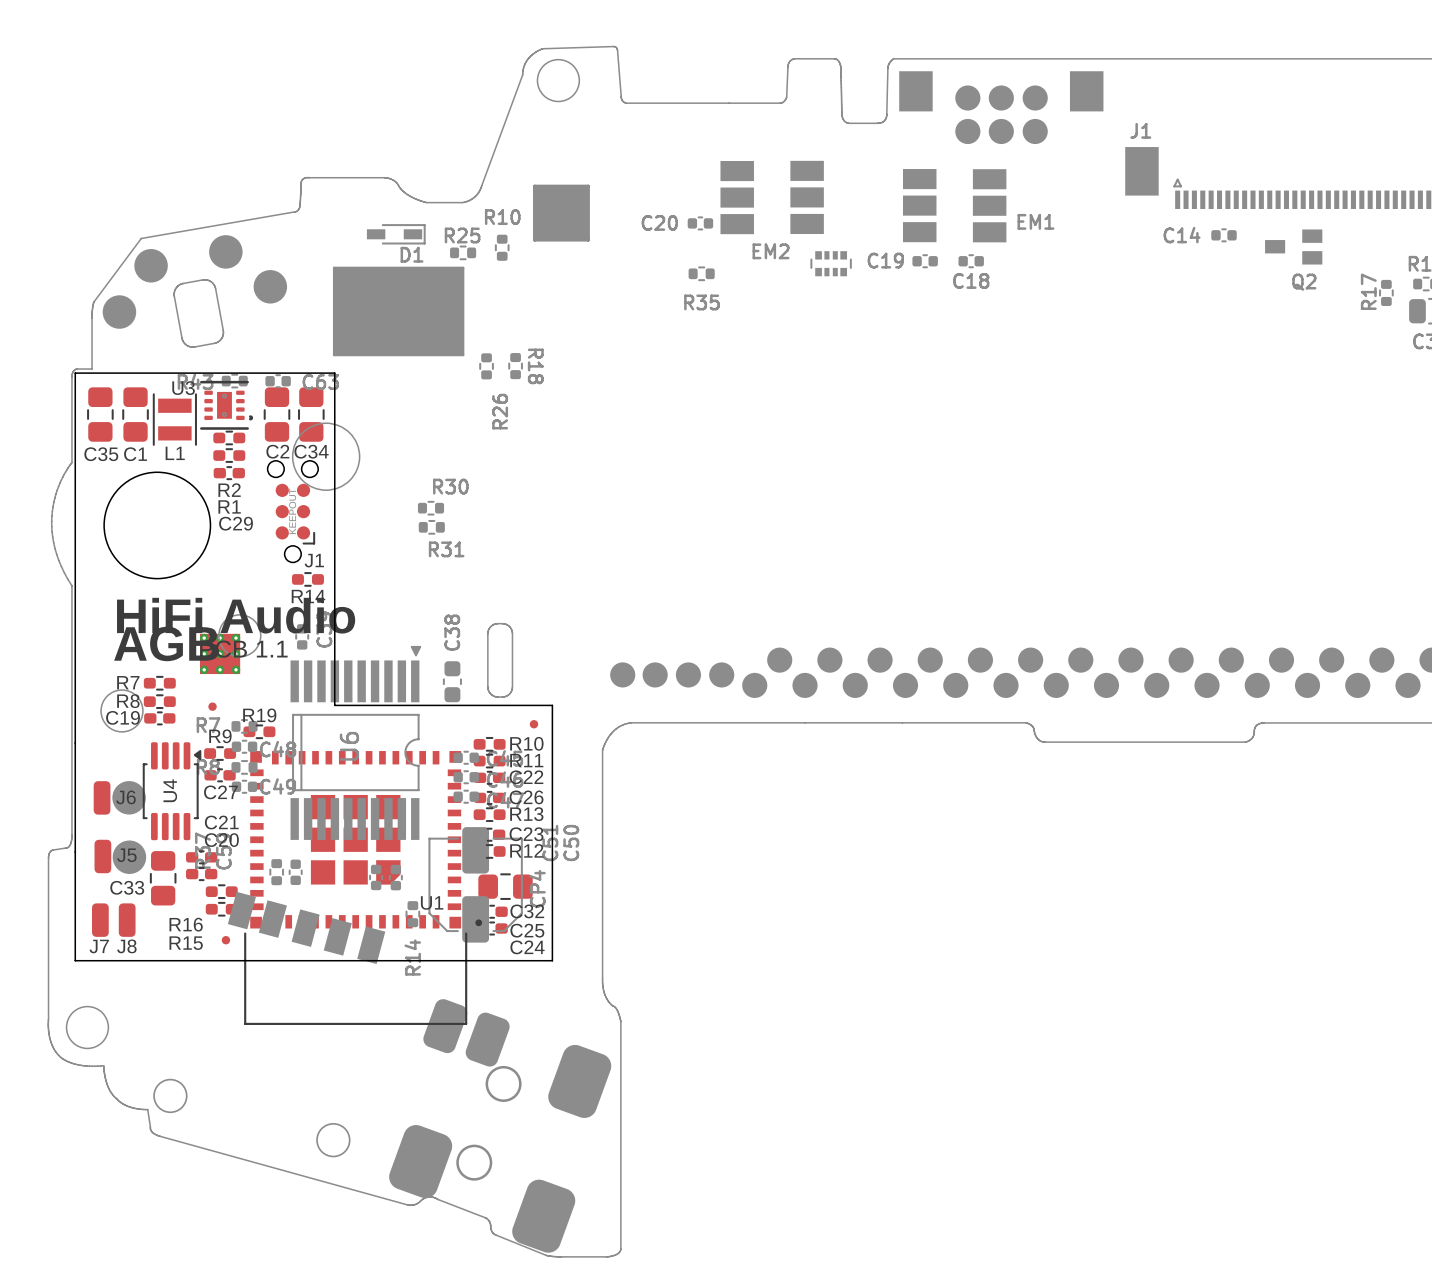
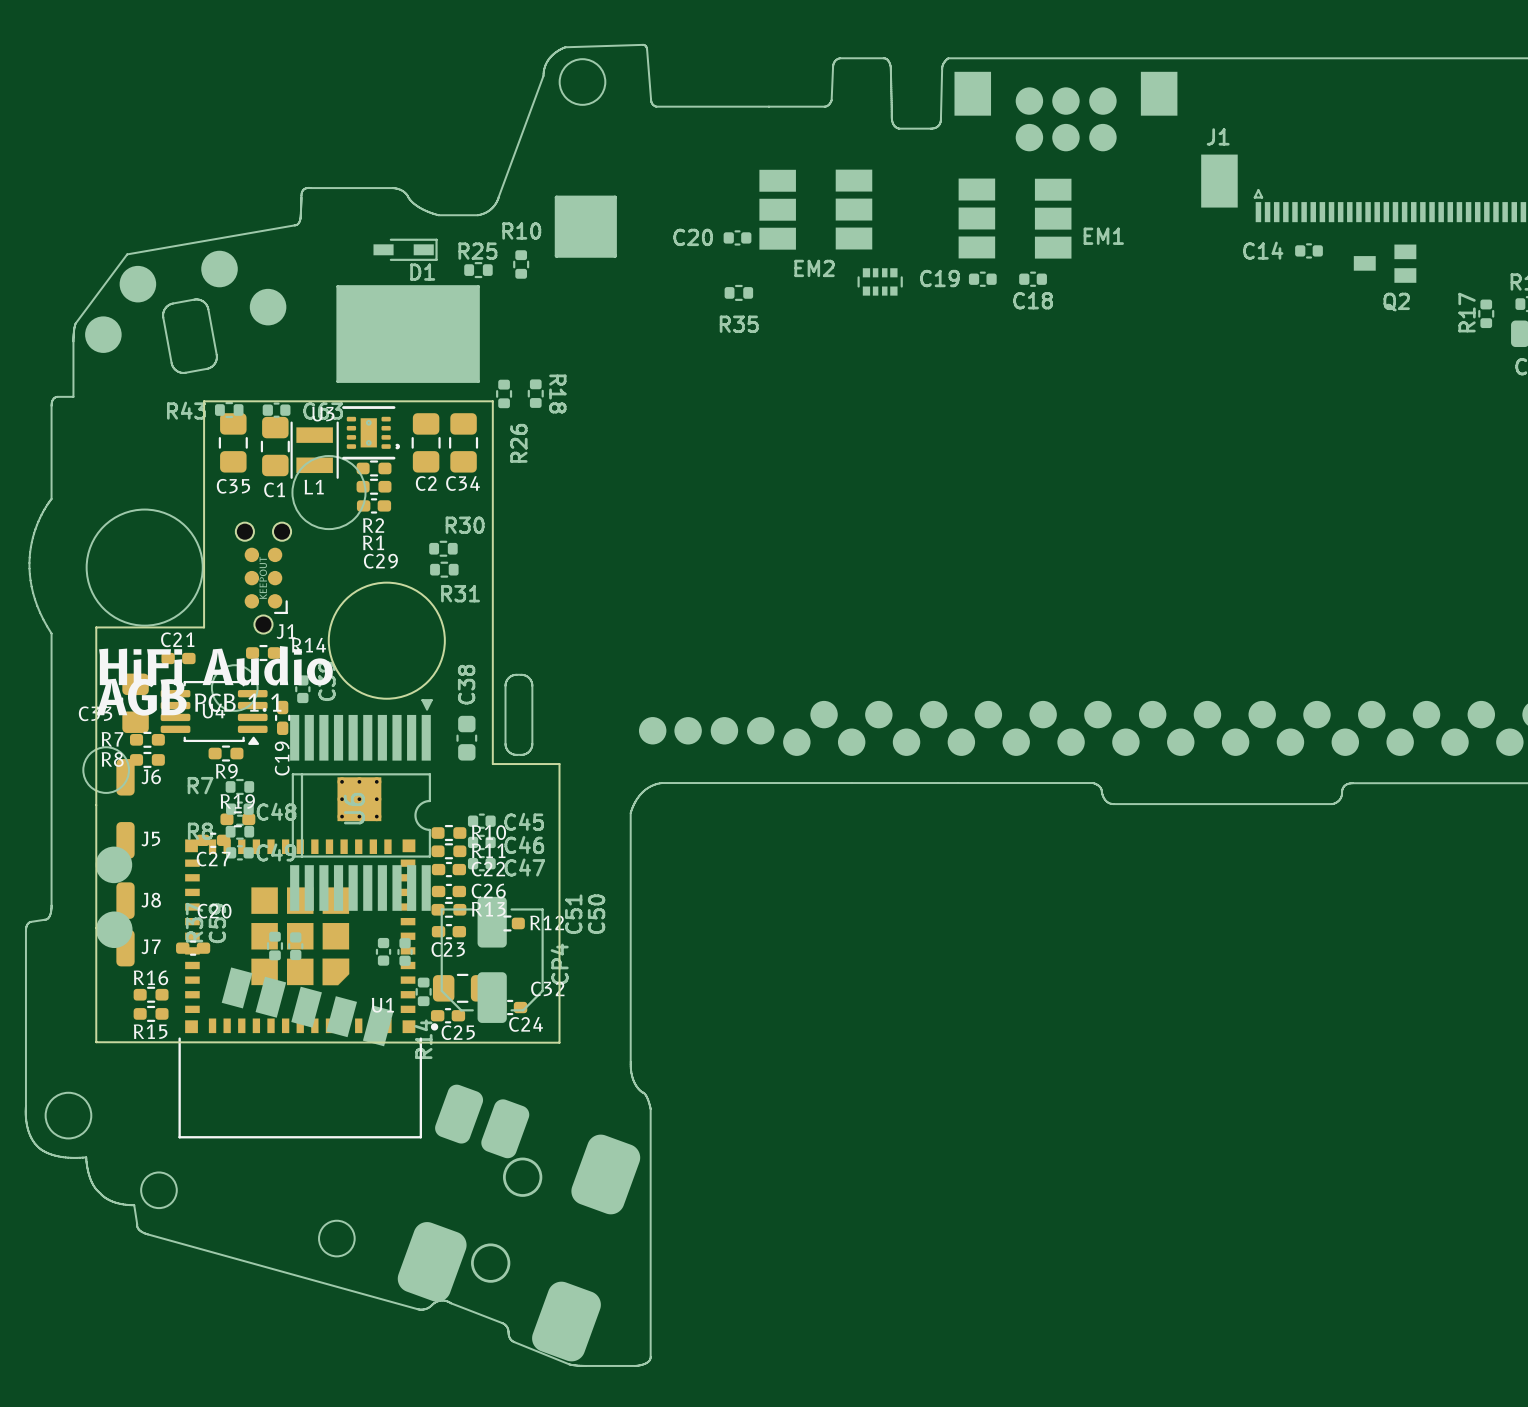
board edge: (211, 373) (75, 373) (75, 960) (552, 960) (552, 705) (537, 705) -> (204, 401) (204, 627) (96, 627) (96, 1042) (559, 1042) (559, 764)
board edge: (334, 373) (334, 705) (476, 705) -> (338, 401) (492, 401) (492, 764)
U3 position: (226, 405) -> (371, 432)
C2: none -> (426, 442)
C35 position: (100, 414) -> (233, 442)
C1: (135, 414) -> none
C34 position: (311, 414) -> (463, 442)
L1 position: (174, 419) -> (314, 450)
R2 position: (229, 437) -> (374, 468)
C2 name: C2 (277, 451) -> C1 (274, 489)
R1 position: (229, 455) -> (374, 486)
drawing: none -> [86, 509, 204, 627]
C29 position: (229, 473) -> (374, 505)
J1 position: (292, 511) -> (263, 578)
round board edge position: (157, 525) -> (386, 640)
R14 position: (307, 579) -> (263, 653)
part position: (220, 653) -> (359, 799)
part: (212, 706) -> none
C19 name position: C19 (123, 717) -> C19 (282, 758)
C19 rotation: 0° (159, 718) -> 90° clockwise (282, 717)
C19 position: (159, 718) -> (282, 717)
part: (533, 724) -> none
R19 position: (259, 731) -> (237, 819)
R9 name position: R9 (220, 736) -> R9 (226, 771)
R10 position: (489, 744) -> (448, 833)
R9 position: (220, 753) -> (226, 753)
R11 position: (489, 761) -> (448, 851)
C22 position: (489, 777) -> (448, 869)
U4 rotation: 0° (172, 791) -> 90° clockwise (214, 712)
U4 position: (172, 791) -> (214, 712)
J6 position: (102, 797) -> (125, 777)
C26 position: (489, 797) -> (448, 891)
R13 position: (489, 814) -> (448, 909)
C21 name position: C21 (221, 822) -> C21 (177, 639)
C23 position: (489, 834) -> (448, 931)
C23 name position: C23 (526, 834) -> C23 (448, 949)
J5 position: (102, 856) -> (125, 840)
C21 position: (201, 857) -> (178, 658)
C33 position: (163, 878) -> (135, 703)
C32 position: (505, 886) -> (462, 988)
U1 position: (363, 888) -> (308, 988)
R16 position: (221, 891) -> (151, 994)
R15 position: (221, 909) -> (151, 1013)
C25 position: (492, 911) -> (448, 1015)
J7 position: (100, 920) -> (125, 948)
J8 position: (127, 920) -> (125, 900)
R16 name position: R16 (186, 924) -> R16 (151, 977)
C25 name position: C25 (527, 930) -> C25 (458, 1032)
part: (225, 940) -> none
R15 name position: R15 (186, 943) -> R15 (150, 1031)
J7 name position: J7 (99, 946) -> J7 (151, 946)
J8 name position: J8 (126, 946) -> J8 (151, 900)
C24 name position: C24 (527, 947) -> C24 (526, 1024)

